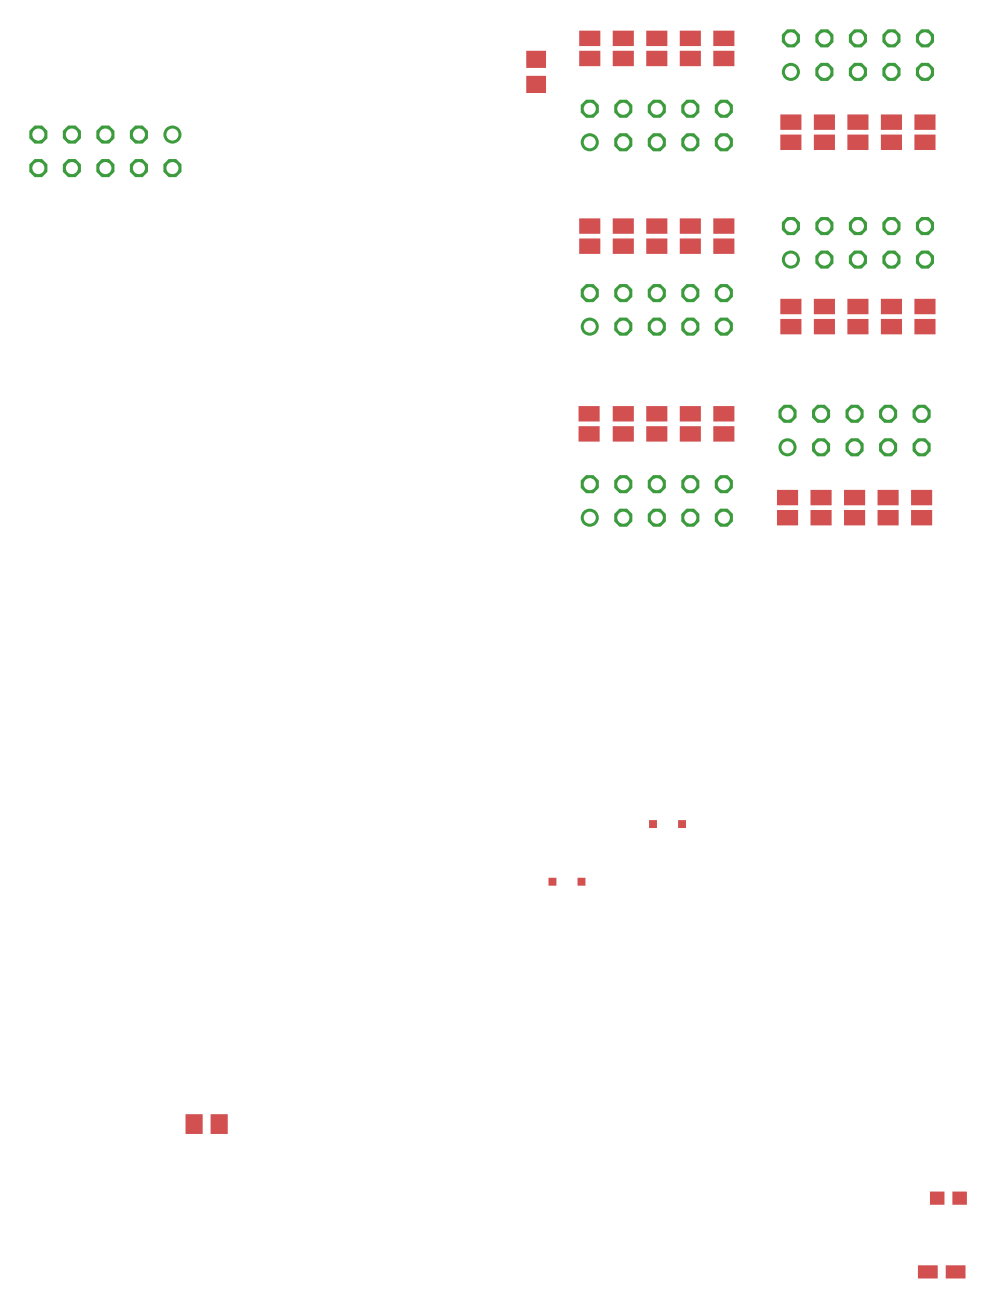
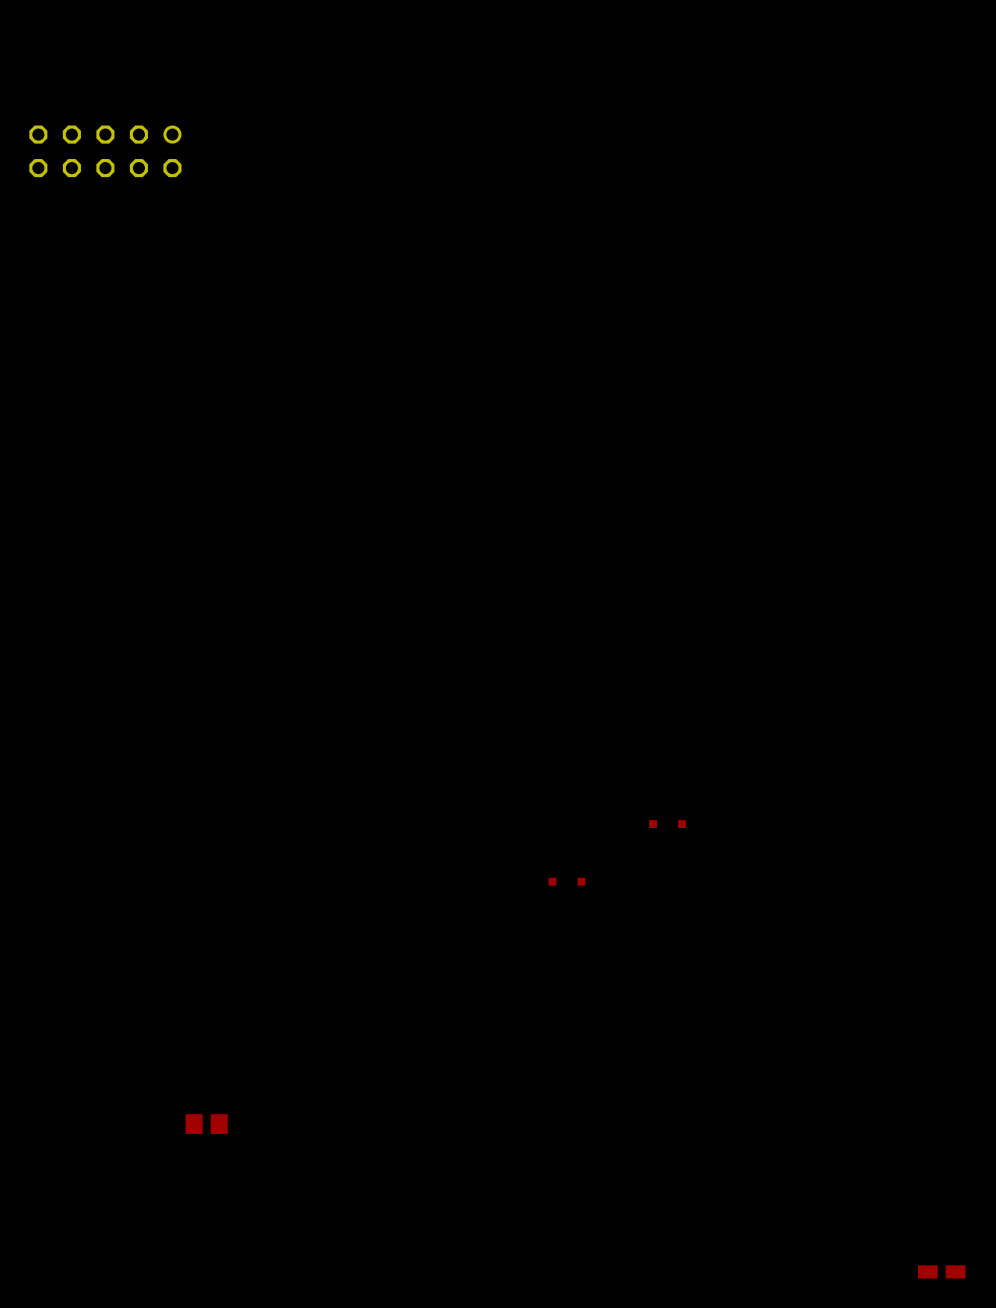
part: (589, 48) -> none
part: (623, 48) -> none
part: (656, 48) -> none
part: (690, 48) -> none
part: (723, 48) -> none
part: (857, 55) -> none
part: (536, 71) -> none
part: (656, 125) -> none
part: (790, 132) -> none
part: (824, 132) -> none
part: (857, 132) -> none
part: (891, 132) -> none
part: (924, 132) -> none
part: (589, 236) -> none
part: (623, 236) -> none
part: (656, 236) -> none
part: (690, 236) -> none
part: (723, 236) -> none
part: (857, 242) -> none
part: (656, 309) -> none
part: (790, 316) -> none
part: (824, 316) -> none
part: (857, 316) -> none
part: (891, 316) -> none
part: (924, 316) -> none
part: (589, 423) -> none
part: (623, 423) -> none
part: (656, 423) -> none
part: (690, 423) -> none
part: (723, 423) -> none
part: (854, 430) -> none
part: (656, 500) -> none
part: (787, 507) -> none
part: (821, 507) -> none
part: (854, 507) -> none
part: (888, 507) -> none
part: (921, 507) -> none
part: (948, 1198) -> none

